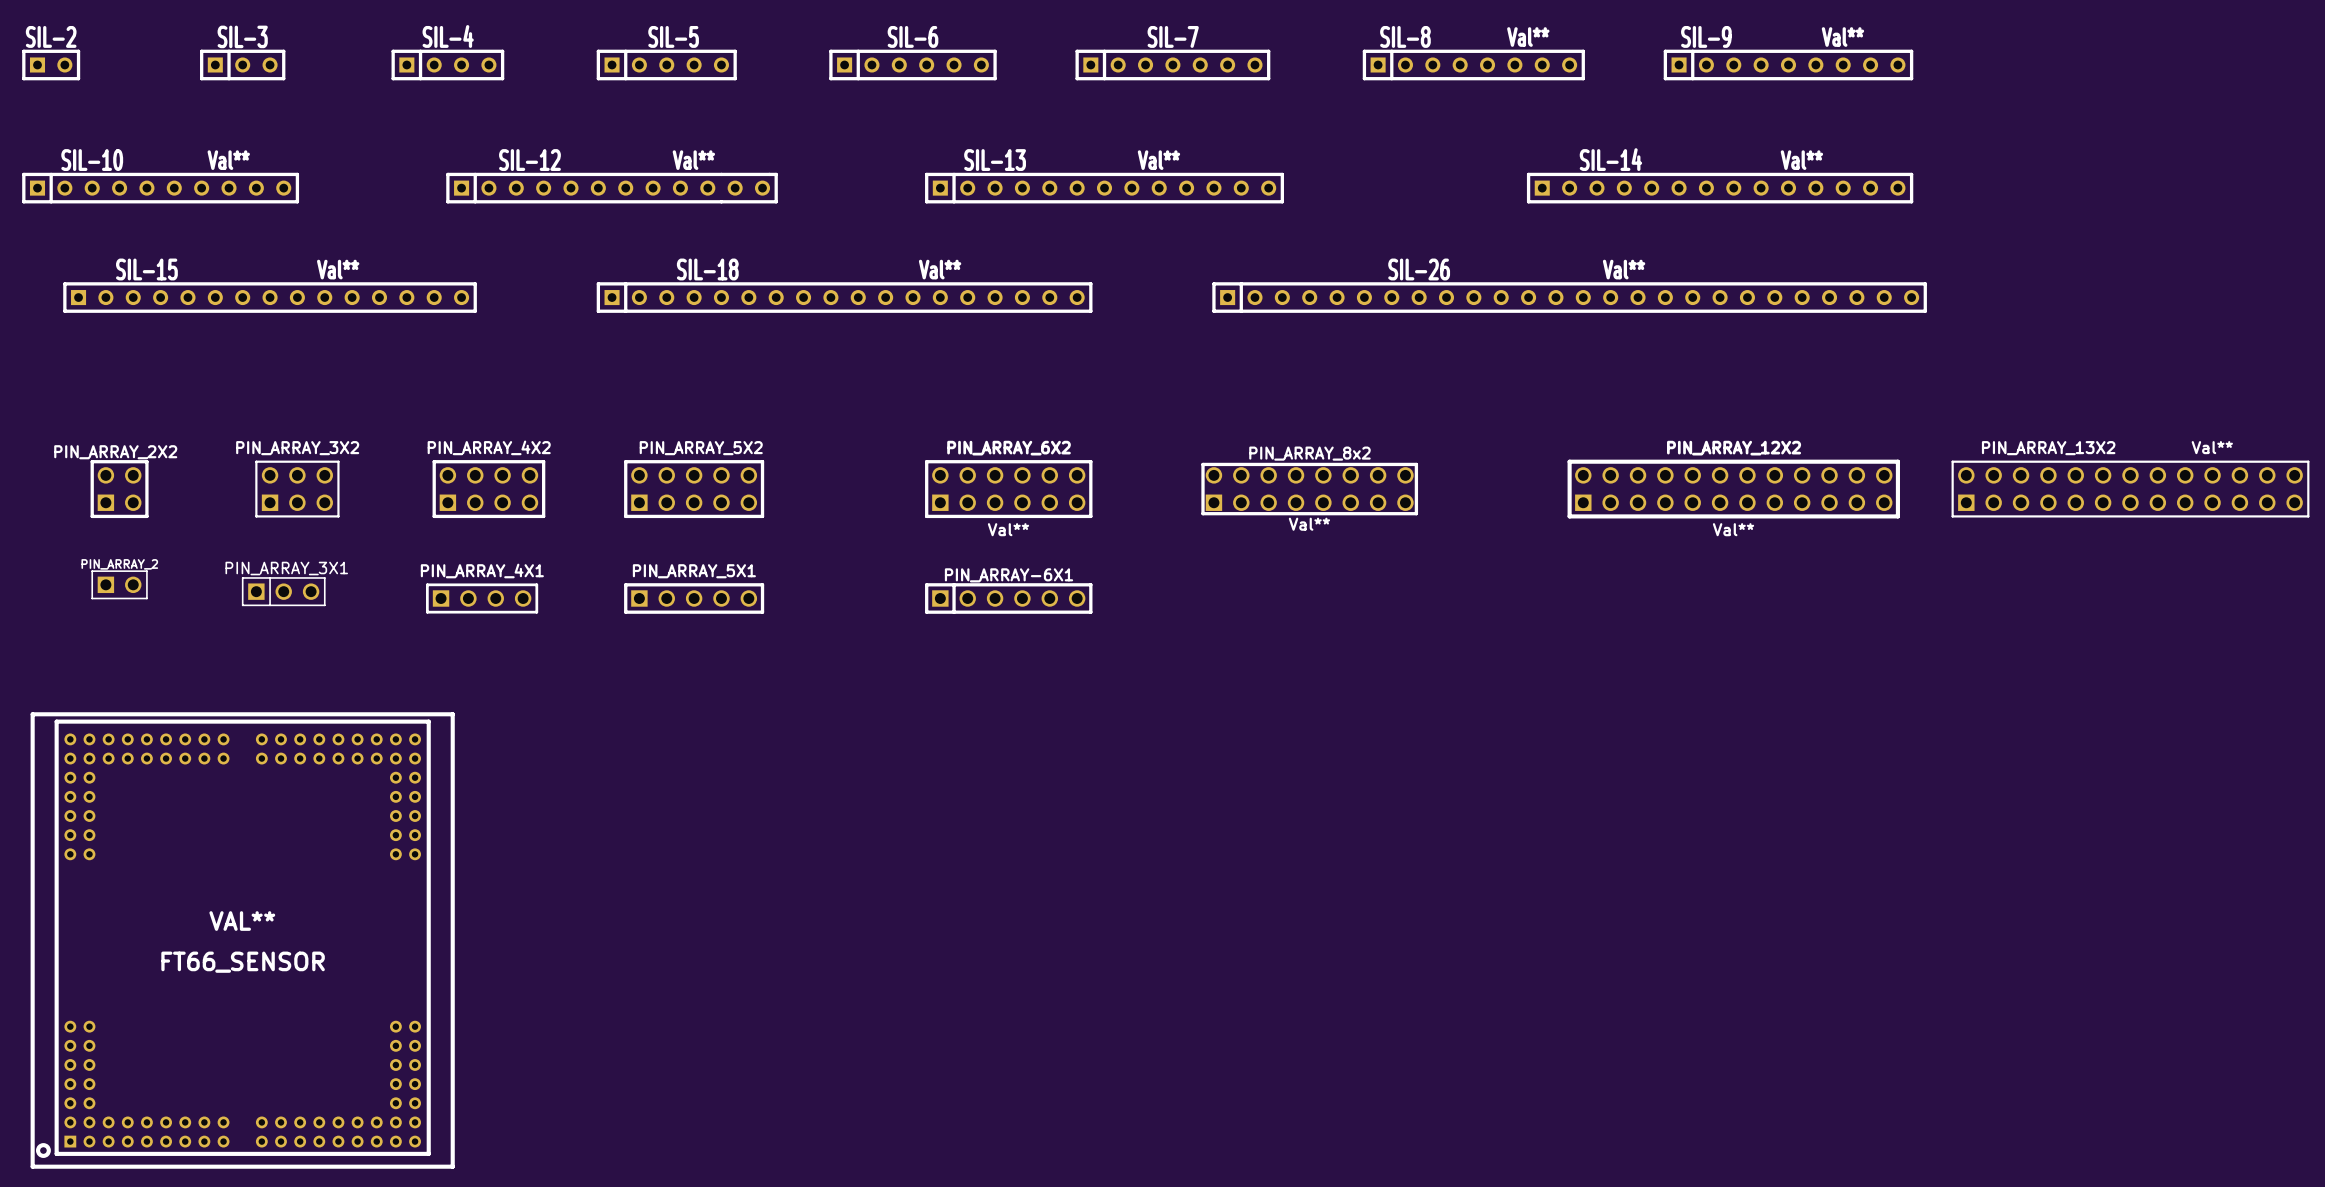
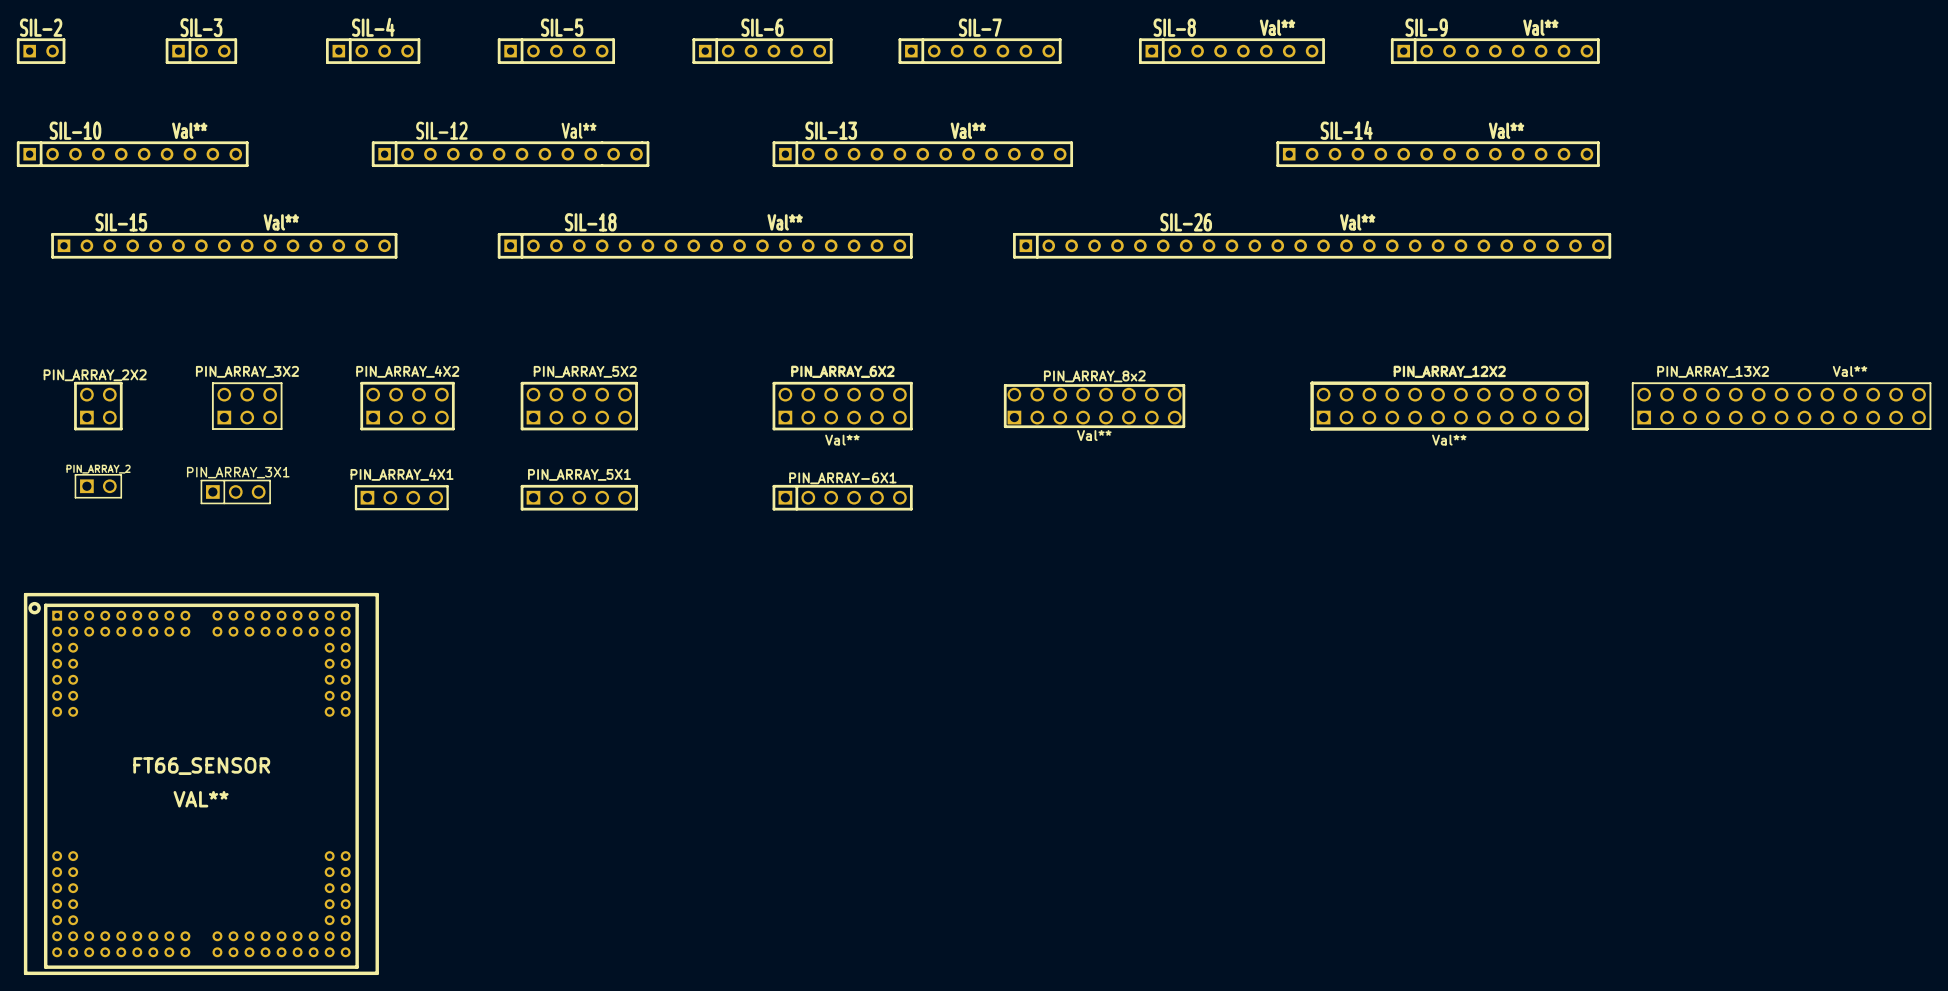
SIL-12 footprint: [446, 172, 778, 204] -> [371, 141, 650, 168]
FT66_SENSOR footprint: [30, 712, 455, 1169] -> [23, 592, 379, 976]
FT66_SENSOR value position: VAL** (242, 921) -> VAL** (201, 799)
FT66_SENSOR name position: FT66_SENSOR (243, 962) -> FT66_SENSOR (201, 766)

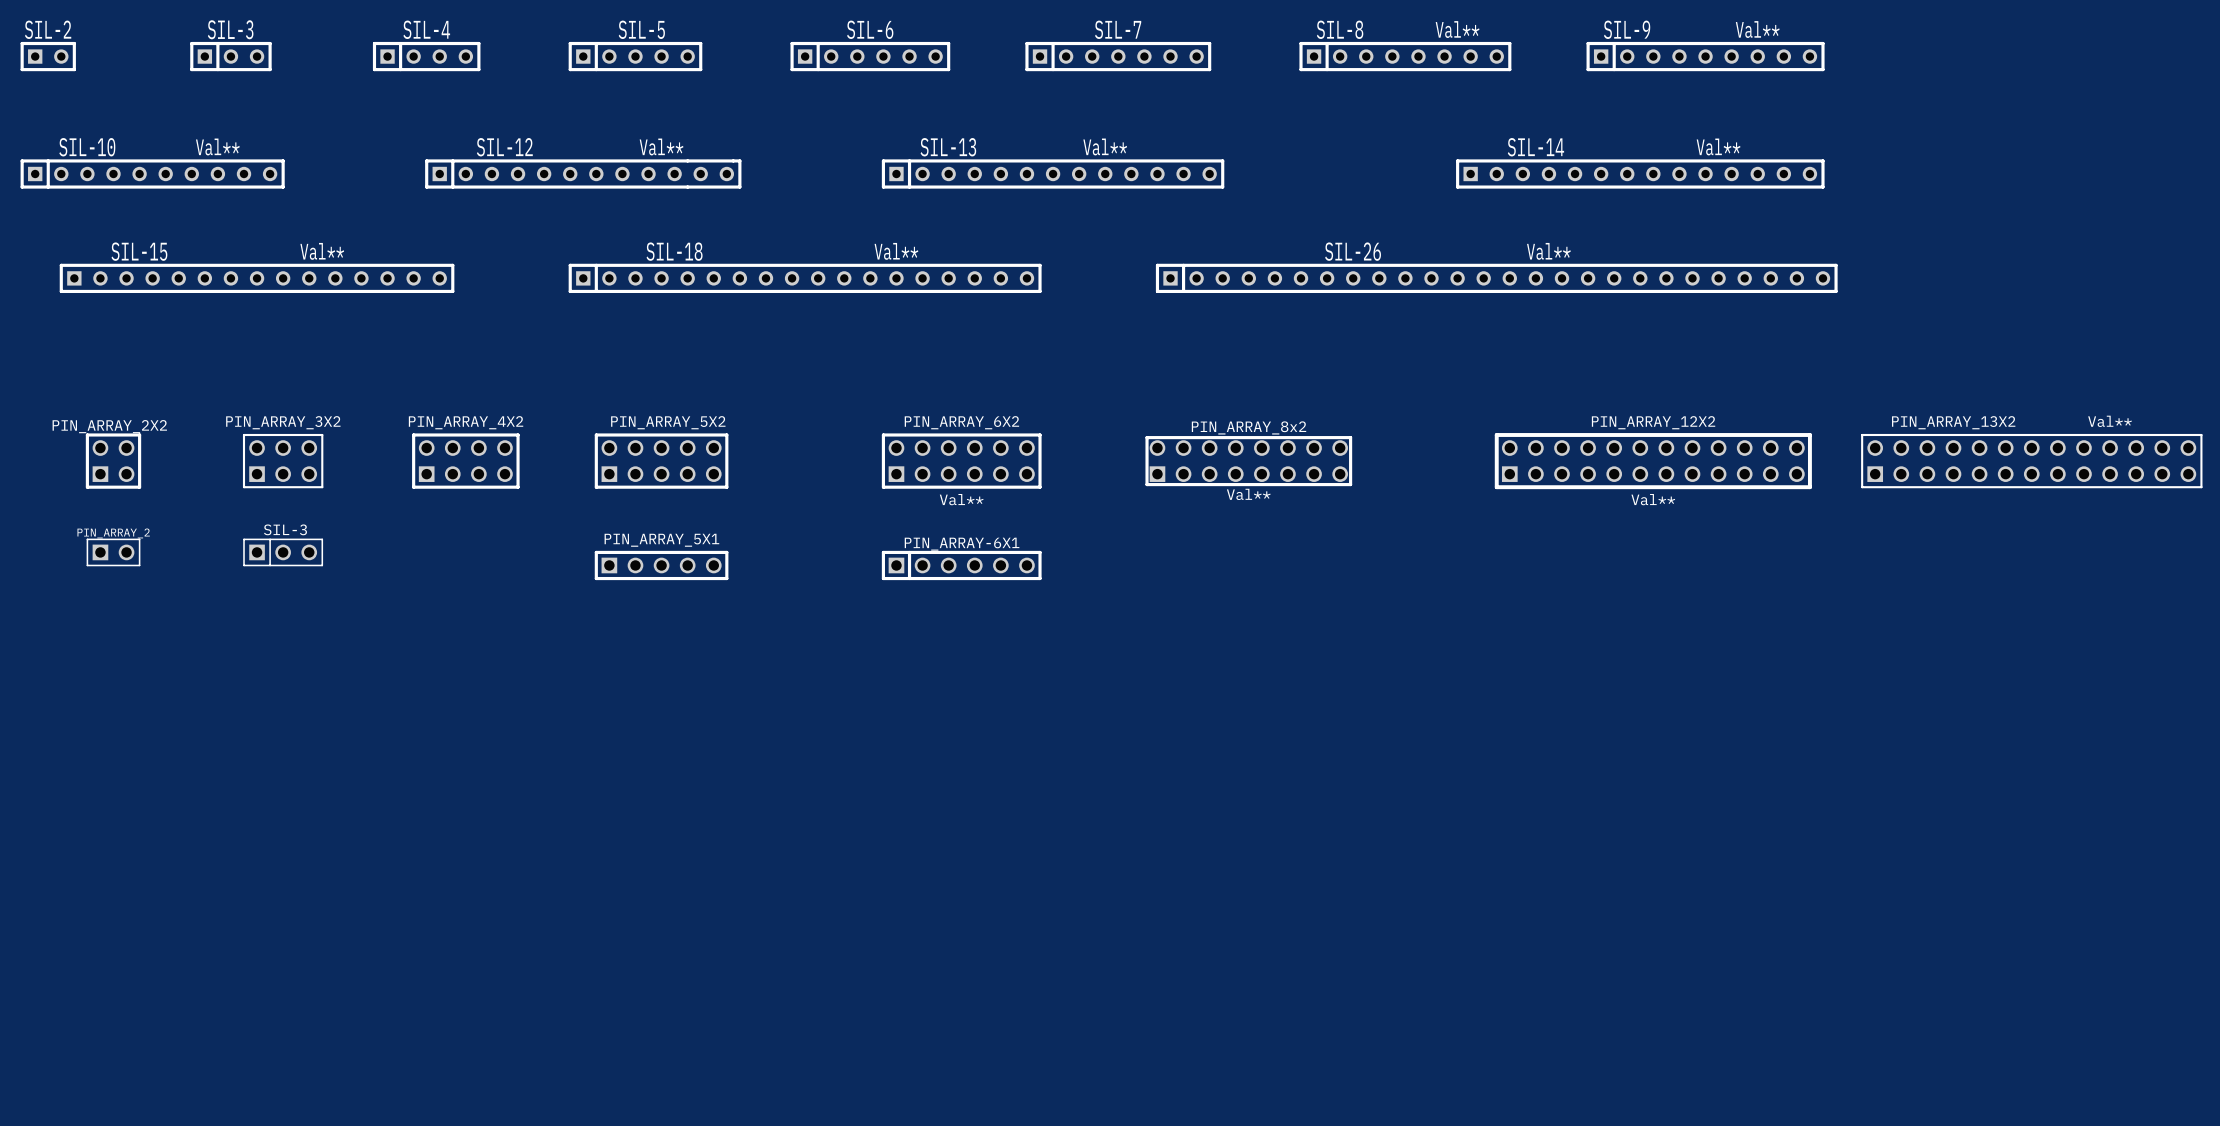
SIL-3: none -> (283, 552)
PIN_ARRAY_3X1: (235, 491) -> none
PIN_ARRAY_4X1: (401, 497) -> none
FT66_SENSOR: VAL** (201, 783) -> none

